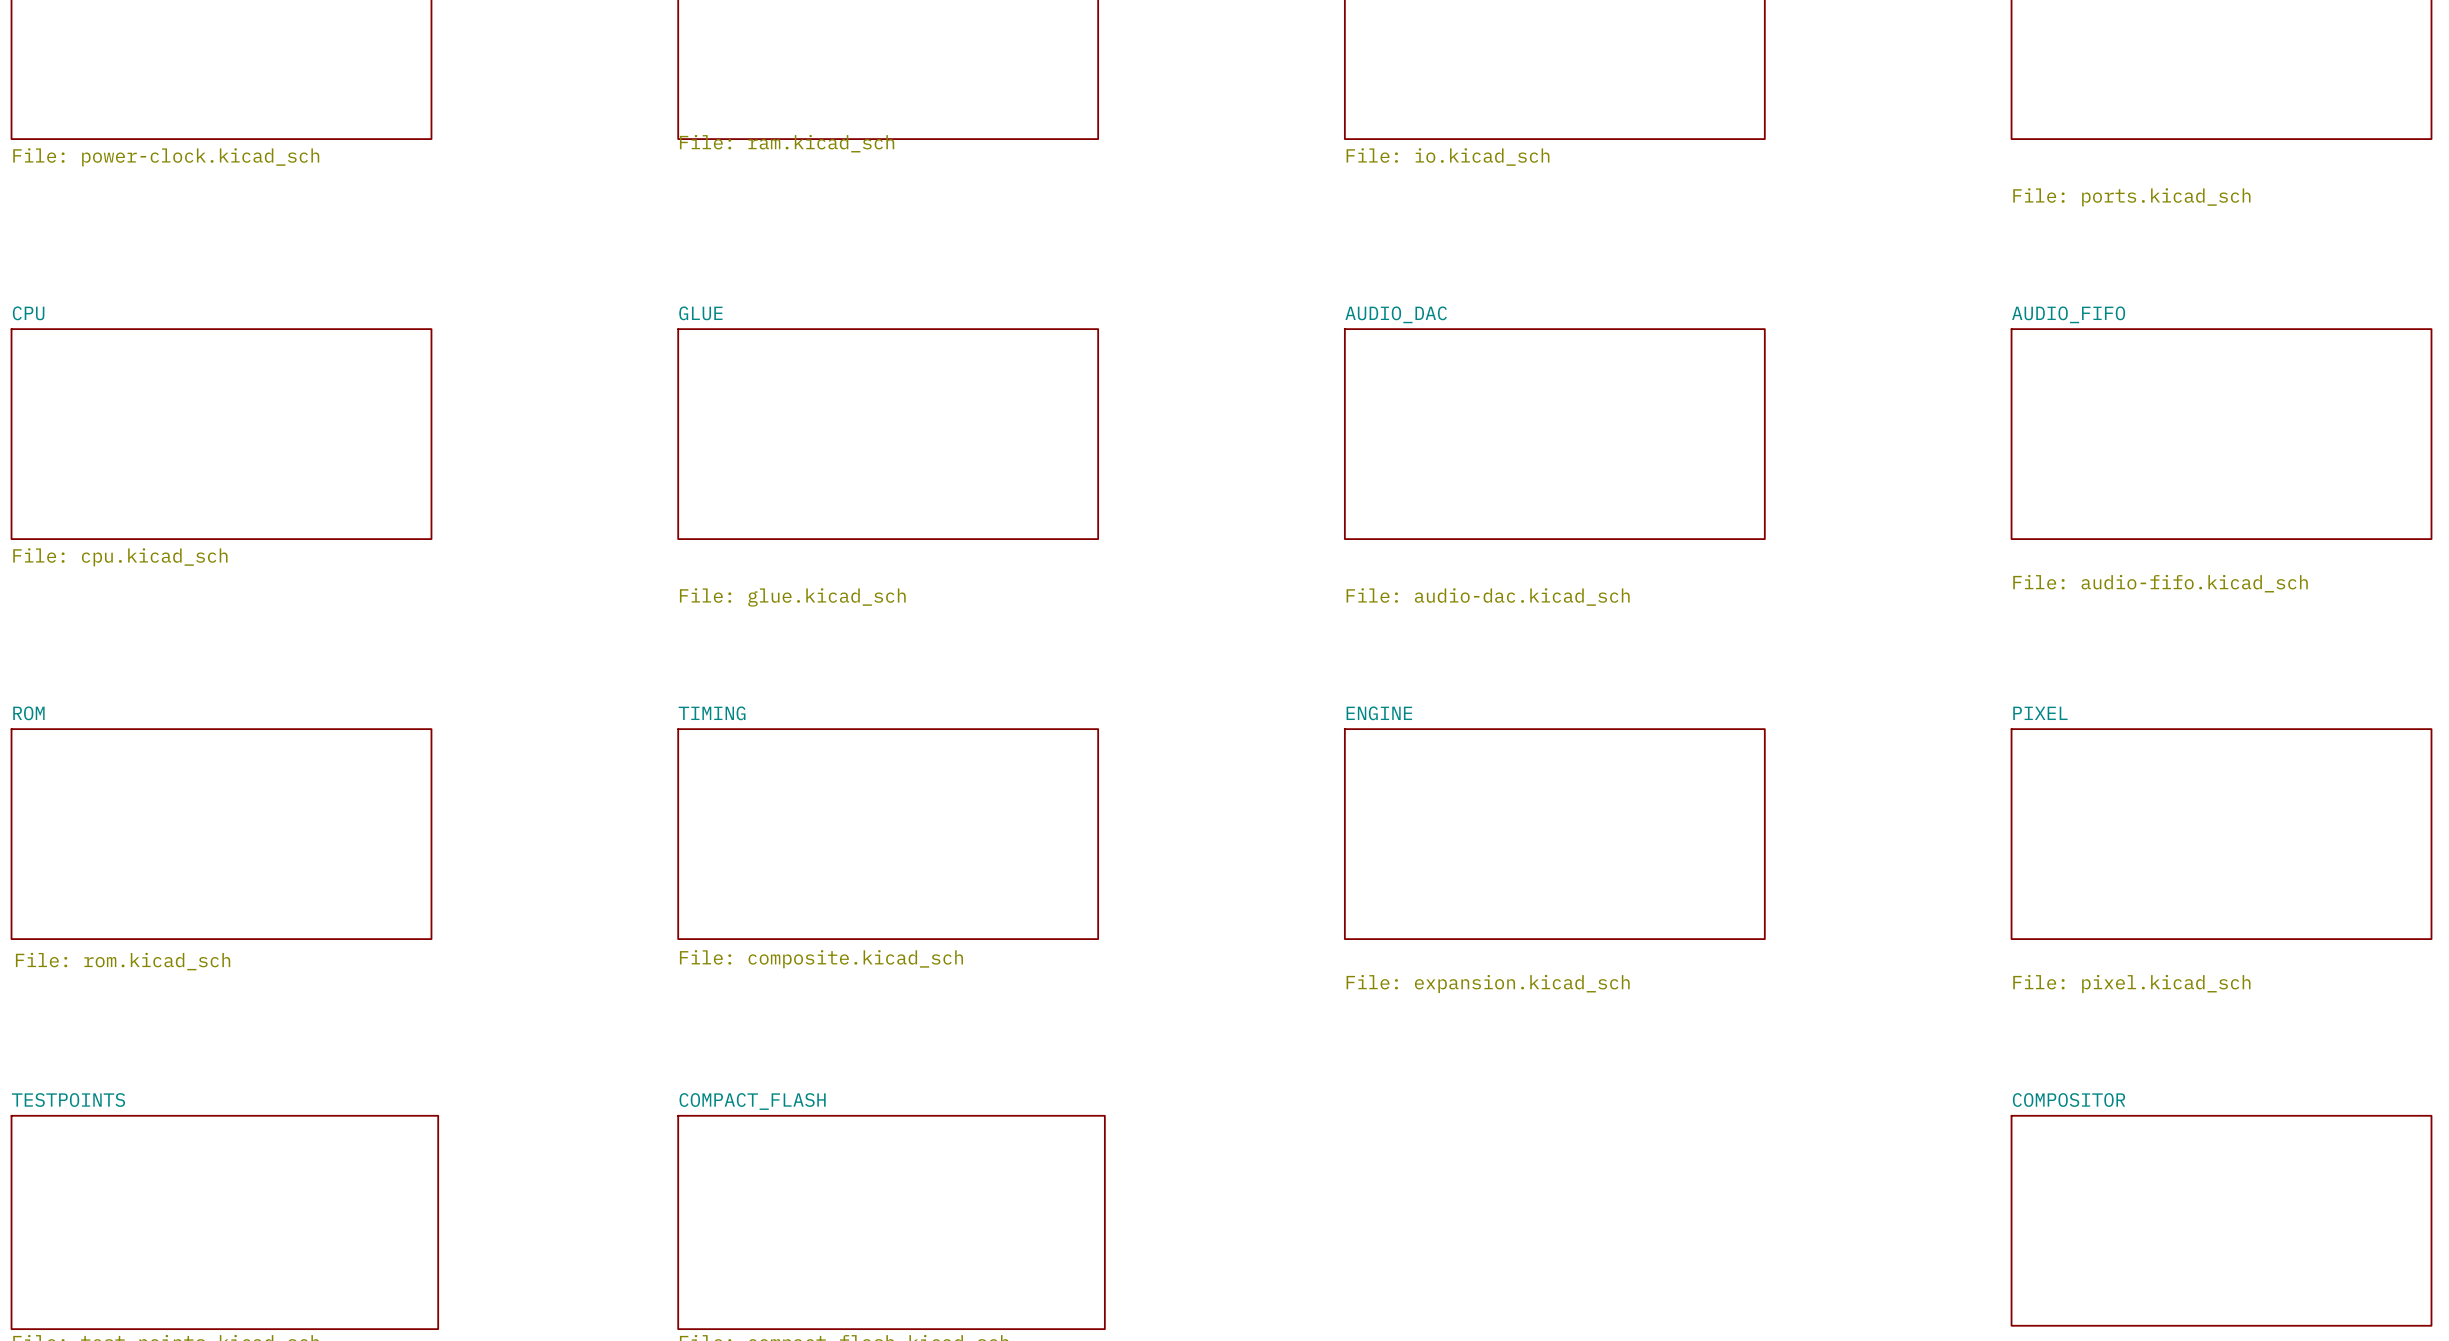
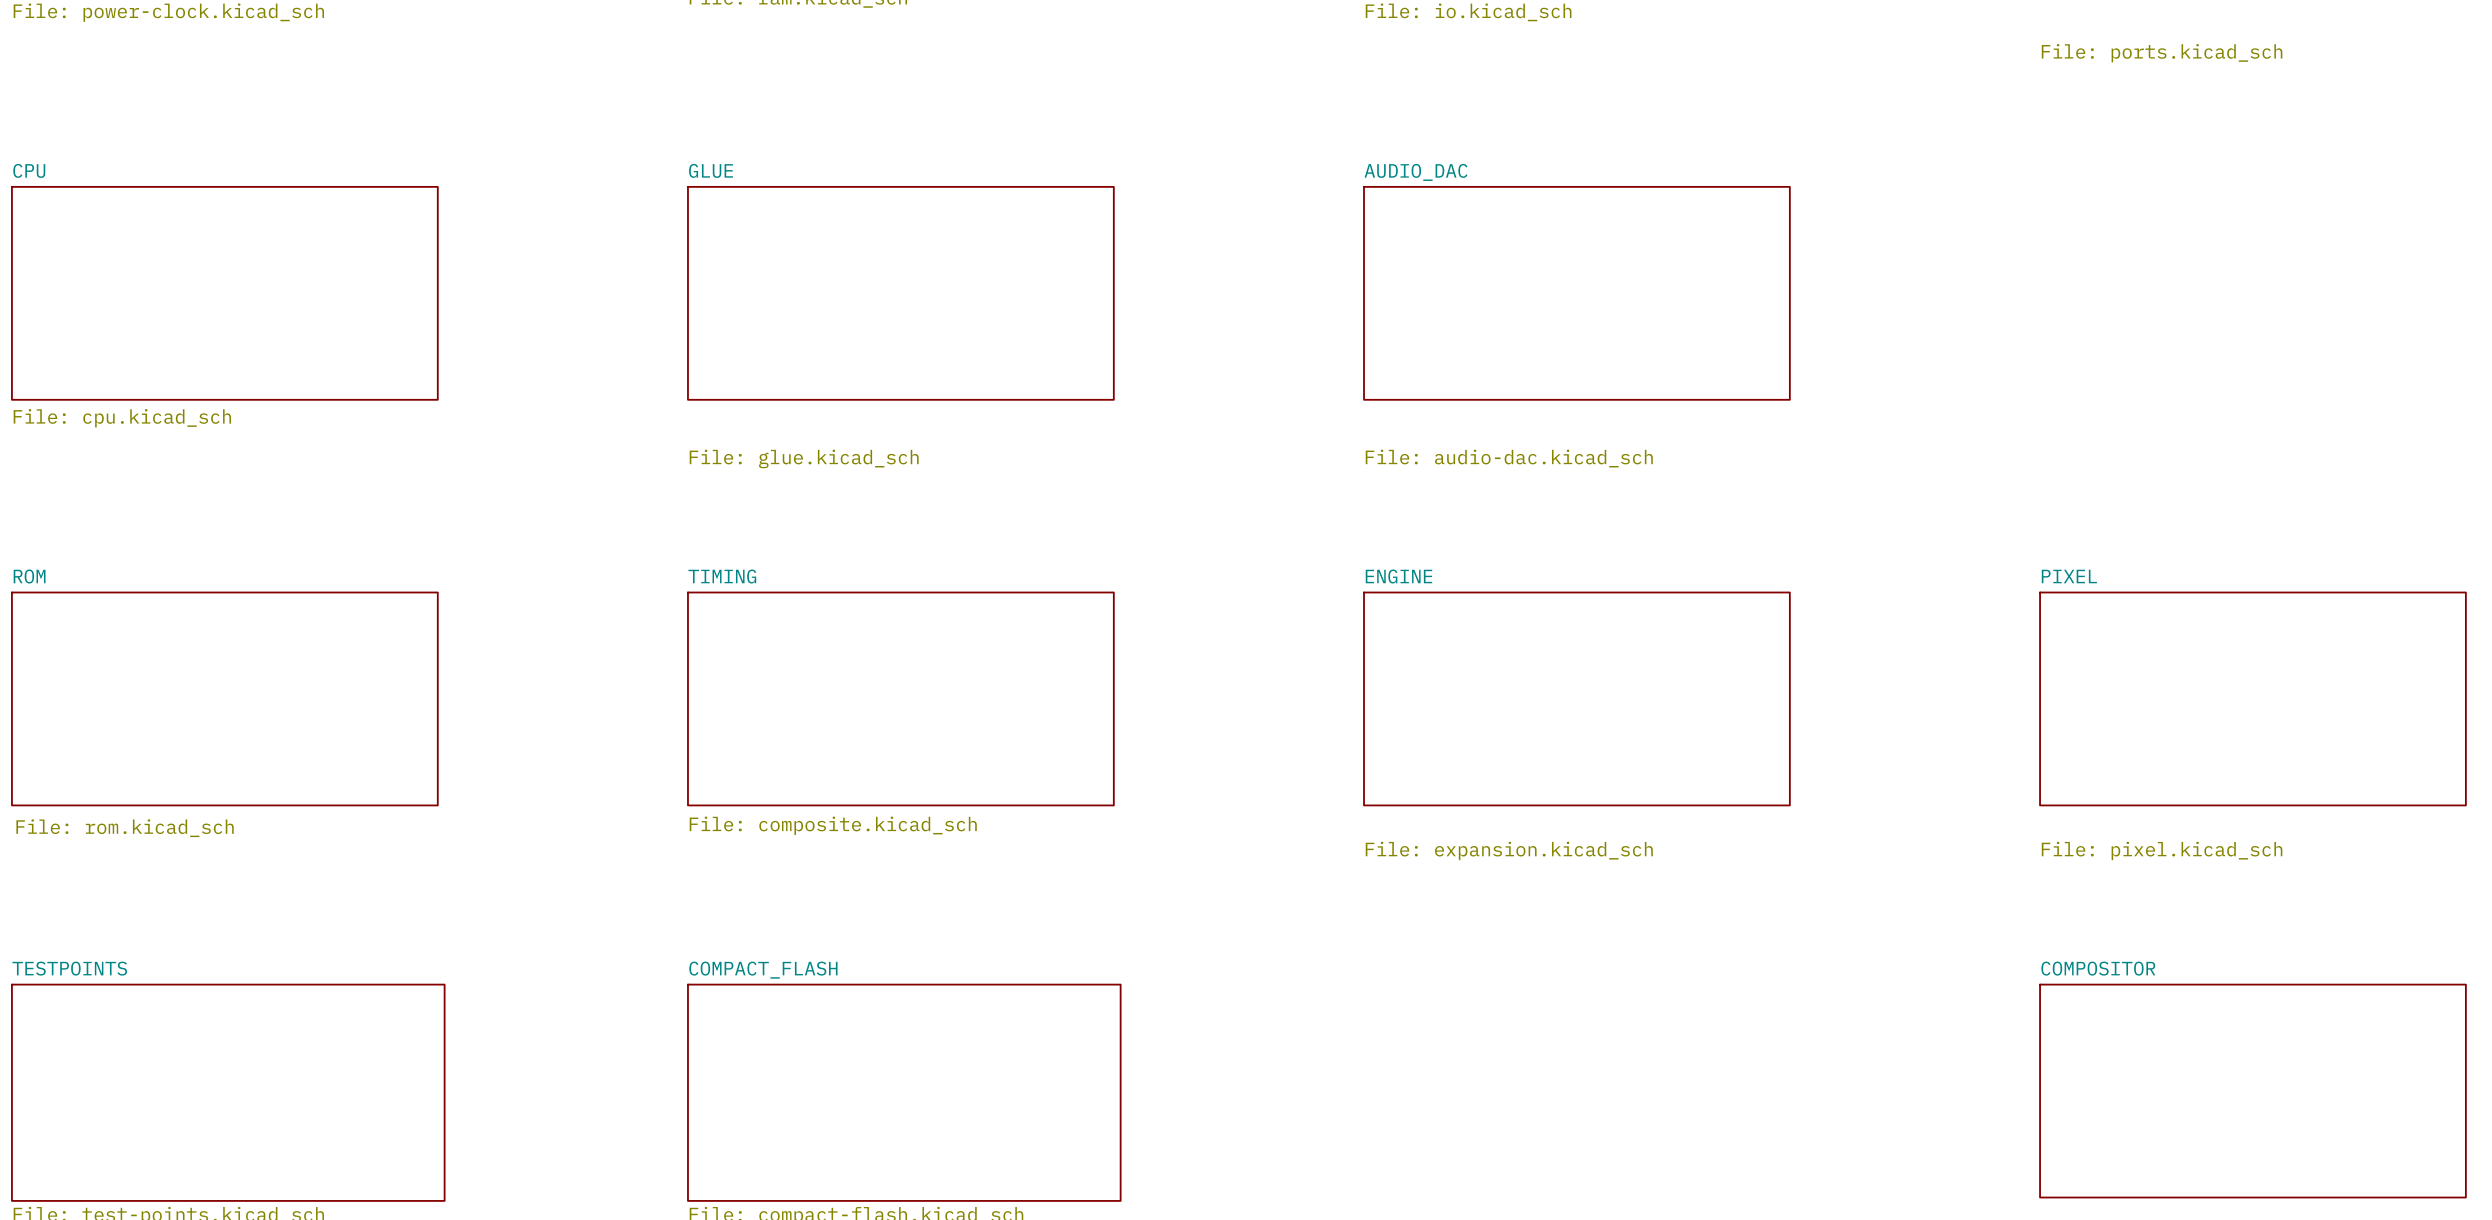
sheet AUDIO_FIFO: File: audio-fifo.kicad_sch (2221, 434) -> none

